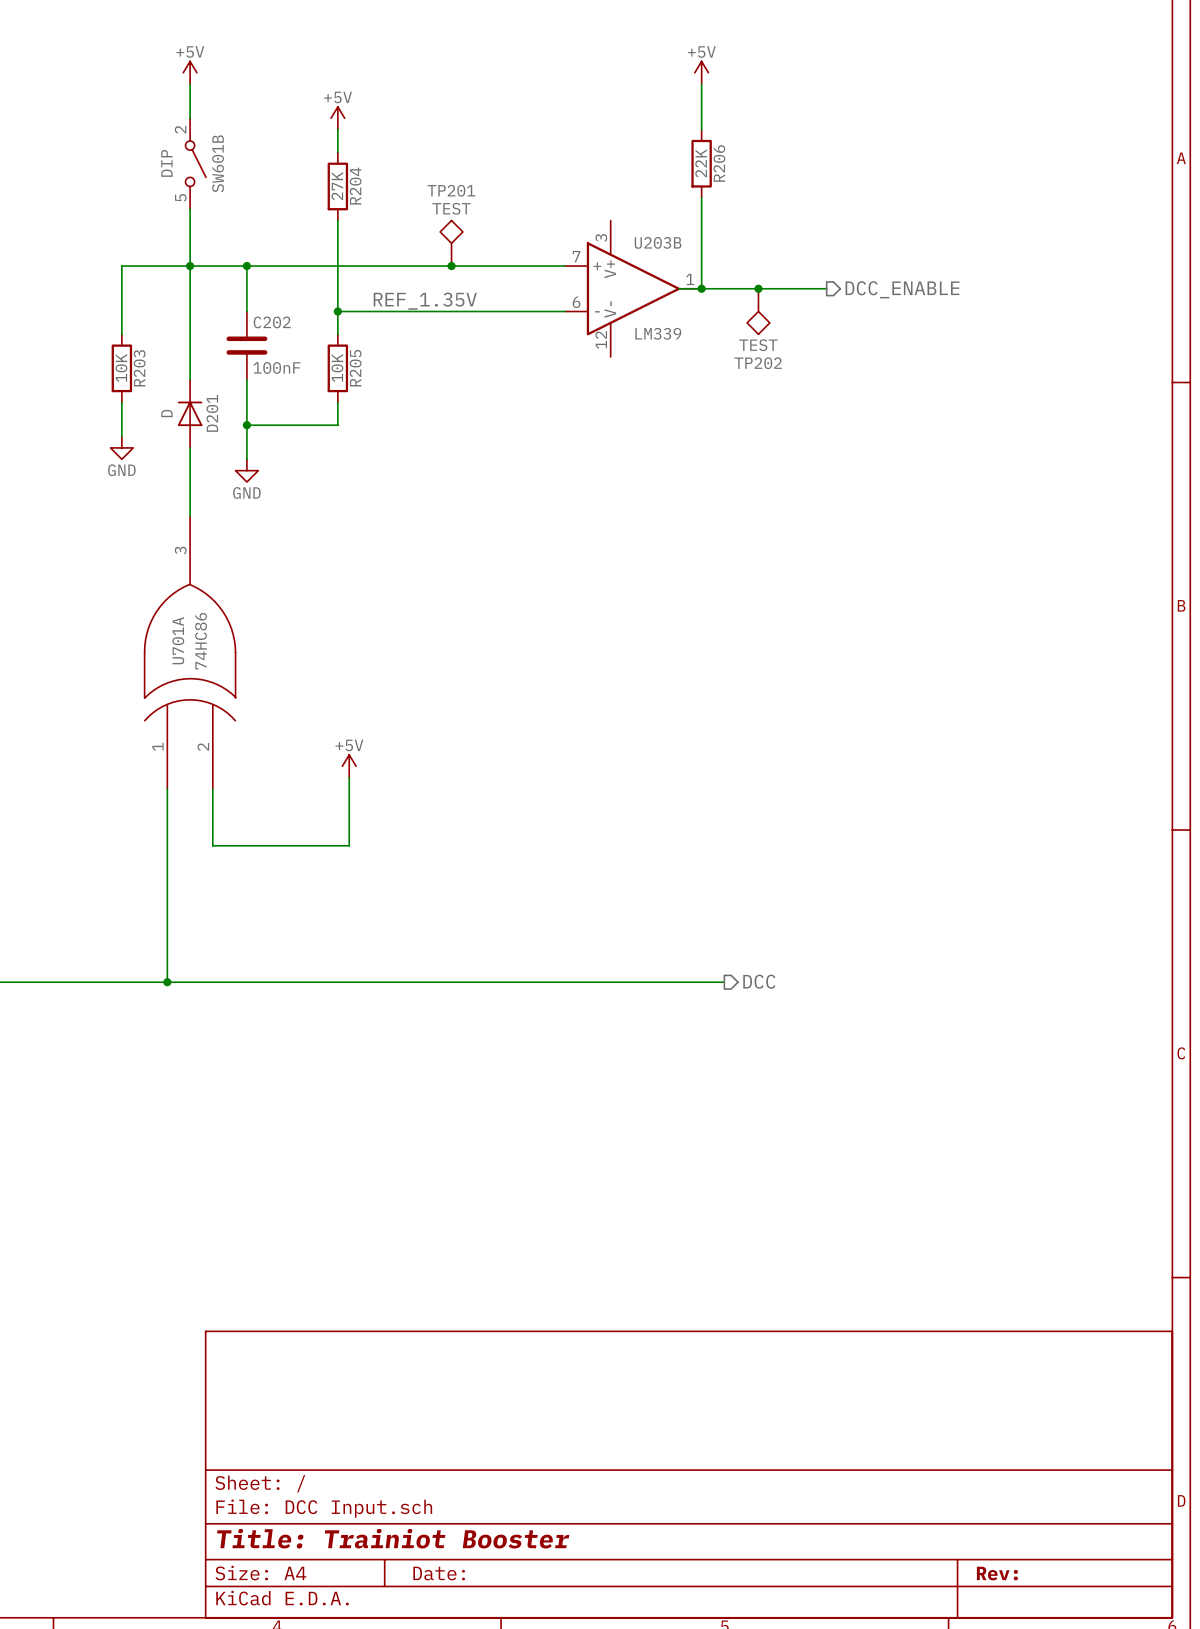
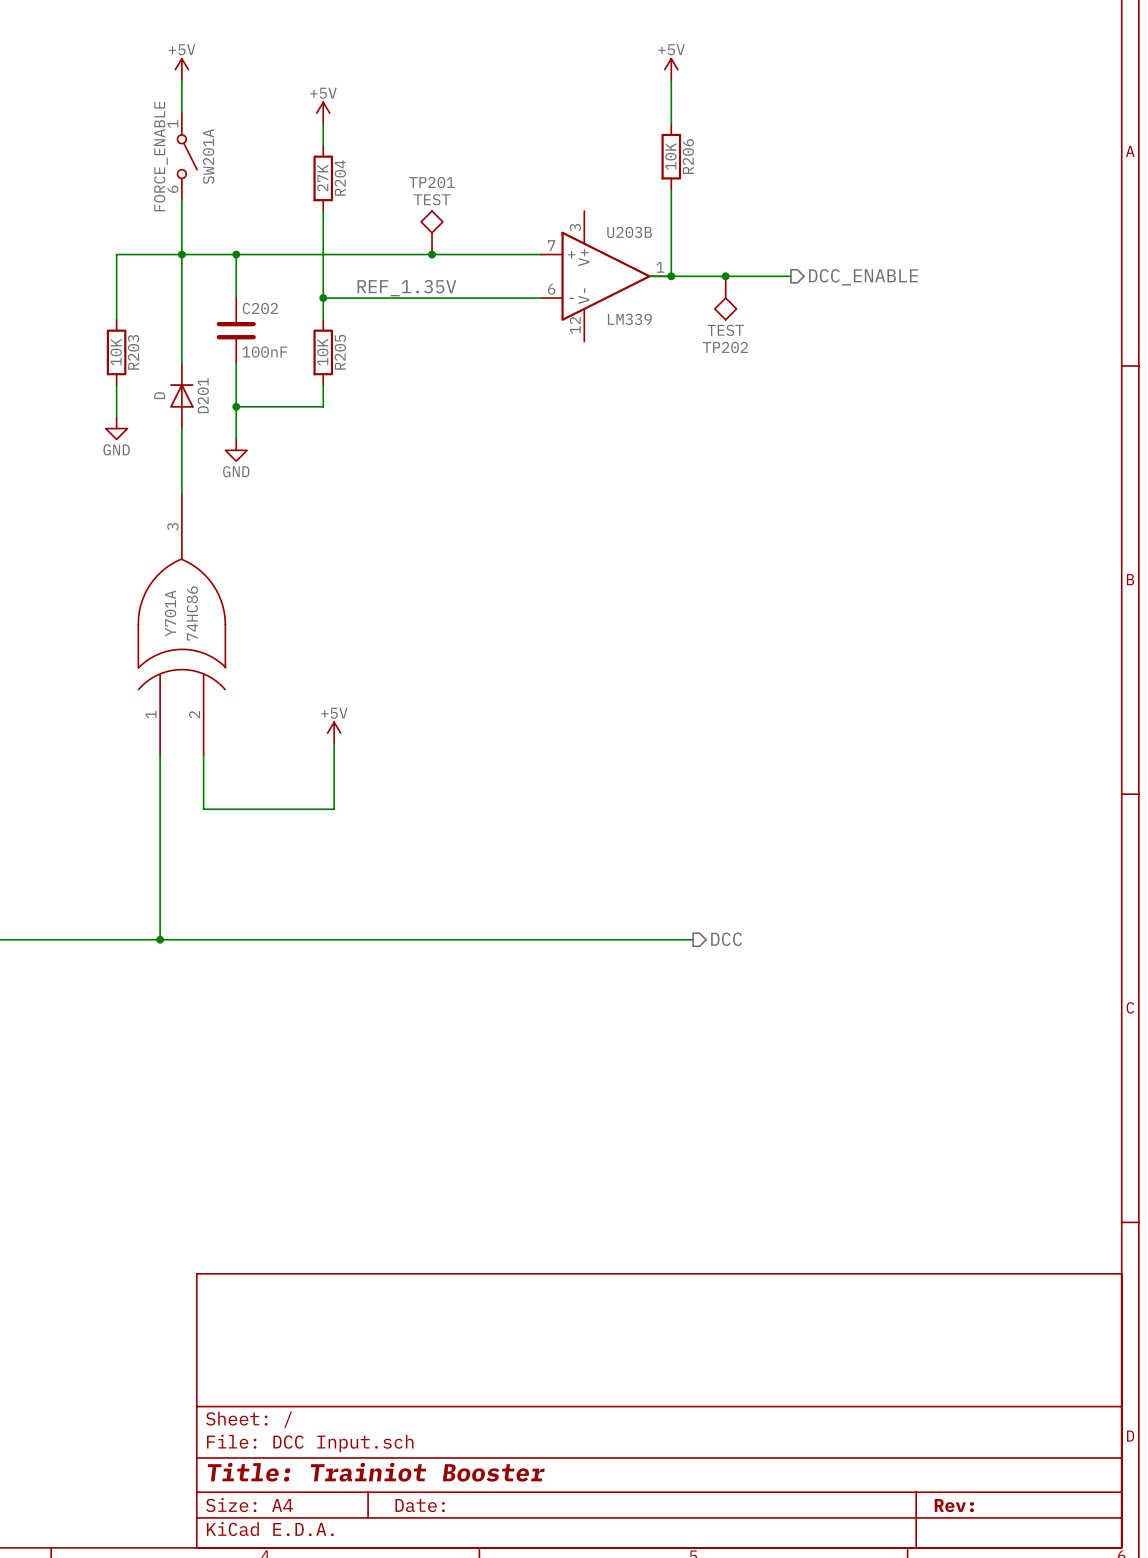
SW601B pin number: 2 (180, 129) -> 1 (172, 123)
SW601B value: DIP (166, 163) -> FORCE_ENABLE (160, 156)
SW601B name: SW601B (218, 163) -> SW201A (208, 156)
R206 value: 22K (701, 163) -> 10K (670, 156)
SW601B pin number: 5 (180, 197) -> 6 (172, 189)
U701A name: U701A (178, 640) -> Y701A (170, 613)

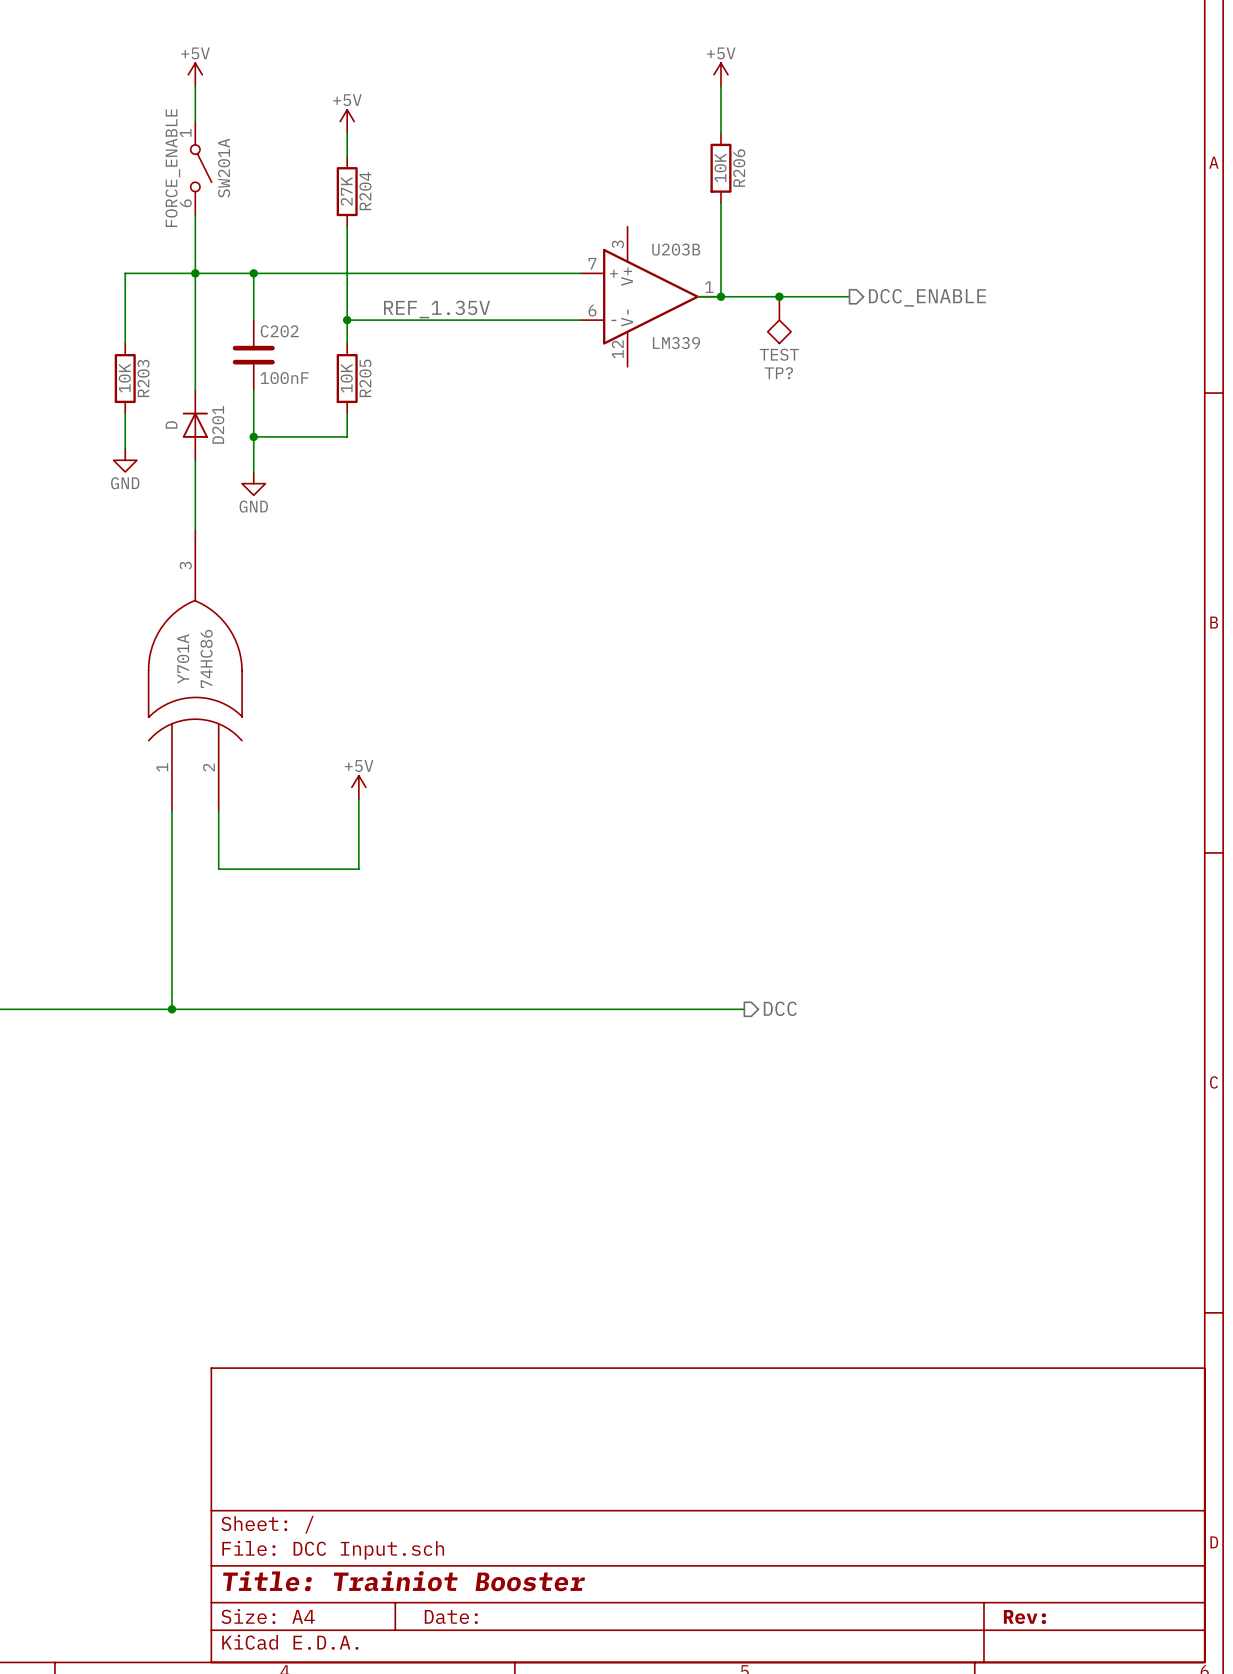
TP201: TEST (432, 232) -> none
junction: (432, 254) -> none
TP202 name: TP202 (725, 347) -> TP? (778, 373)

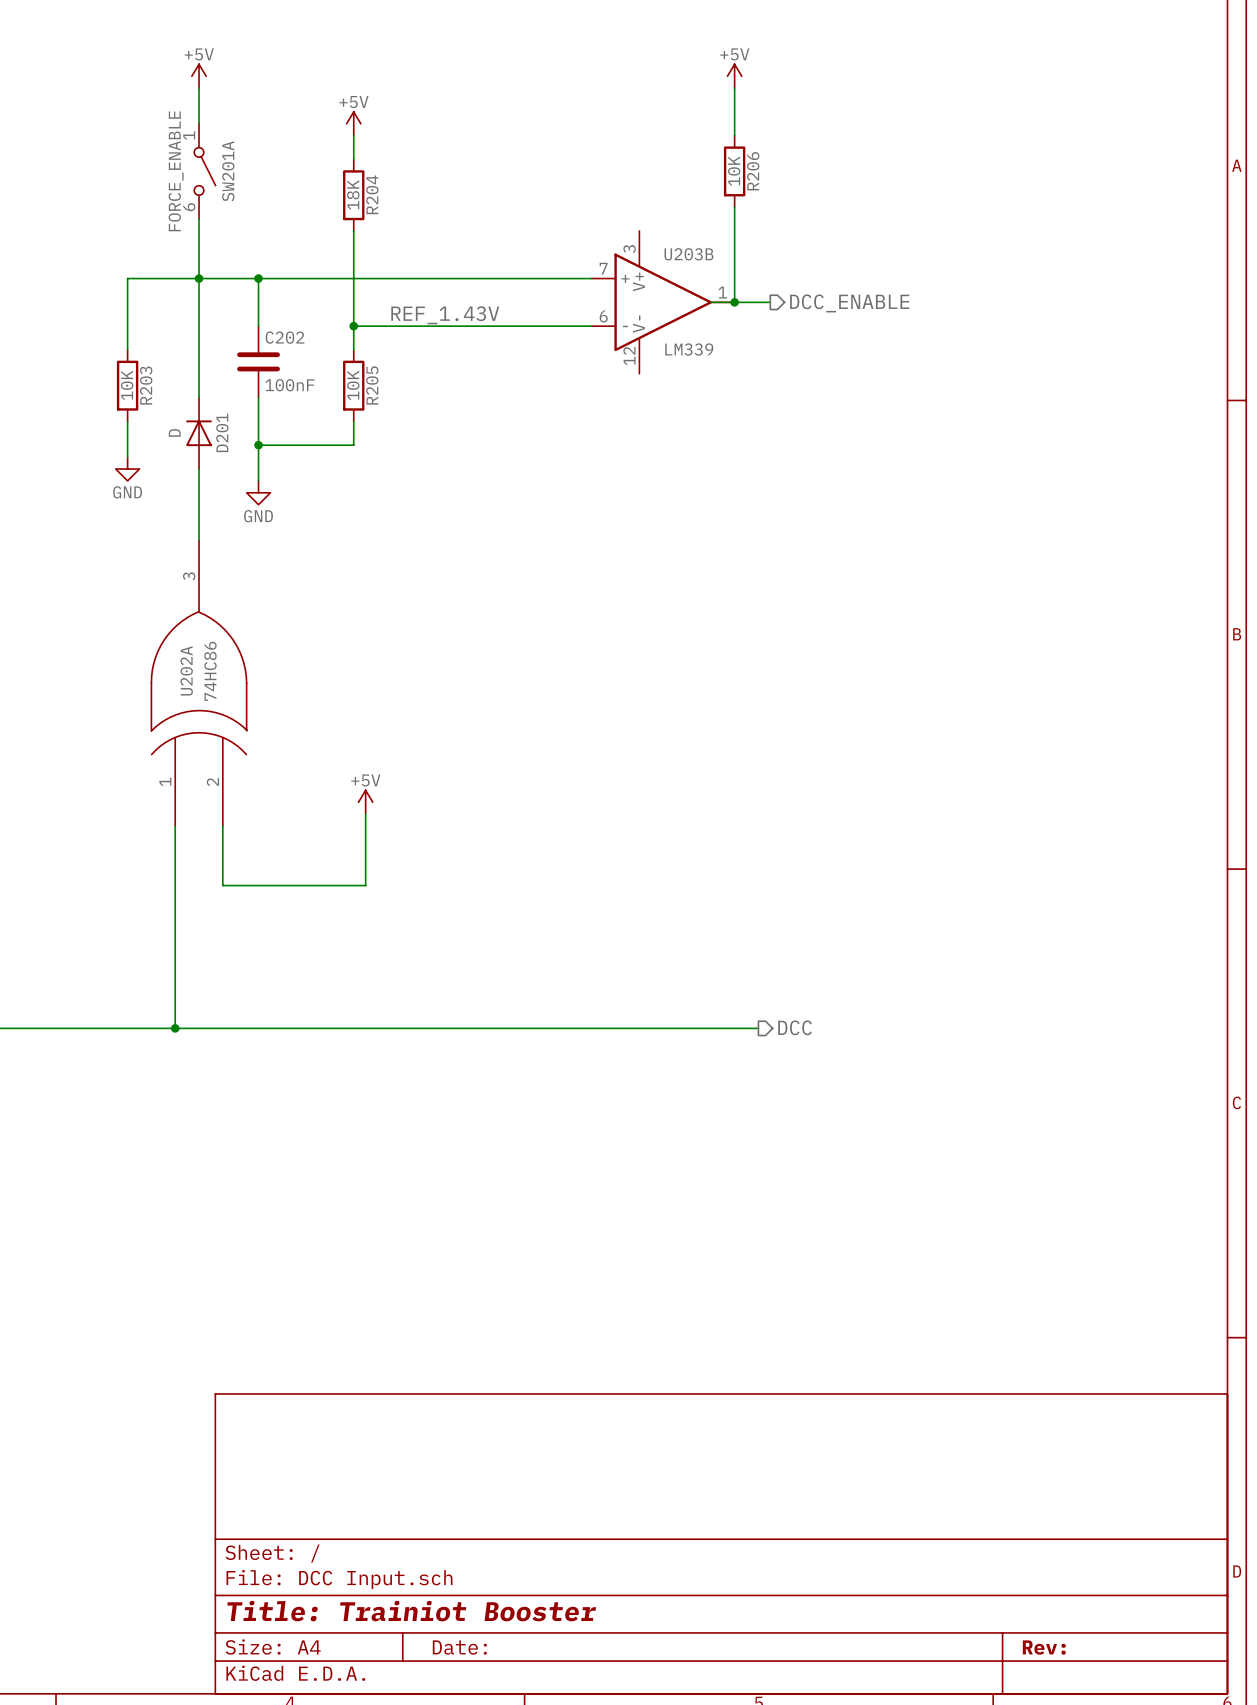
R204 value: 27K (346, 191) -> 18K (353, 194)
wire: (756, 296) (849, 296) -> none
junction: (779, 296) -> none
hierarchical label position: DCC_ENABLE (927, 297) -> DCC_ENABLE (849, 303)
label: REF_1.35V (437, 309) -> REF_1.43V (445, 315)
TP?: TEST (779, 320) -> none
Y701A name: Y701A (183, 658) -> U202A (186, 670)

